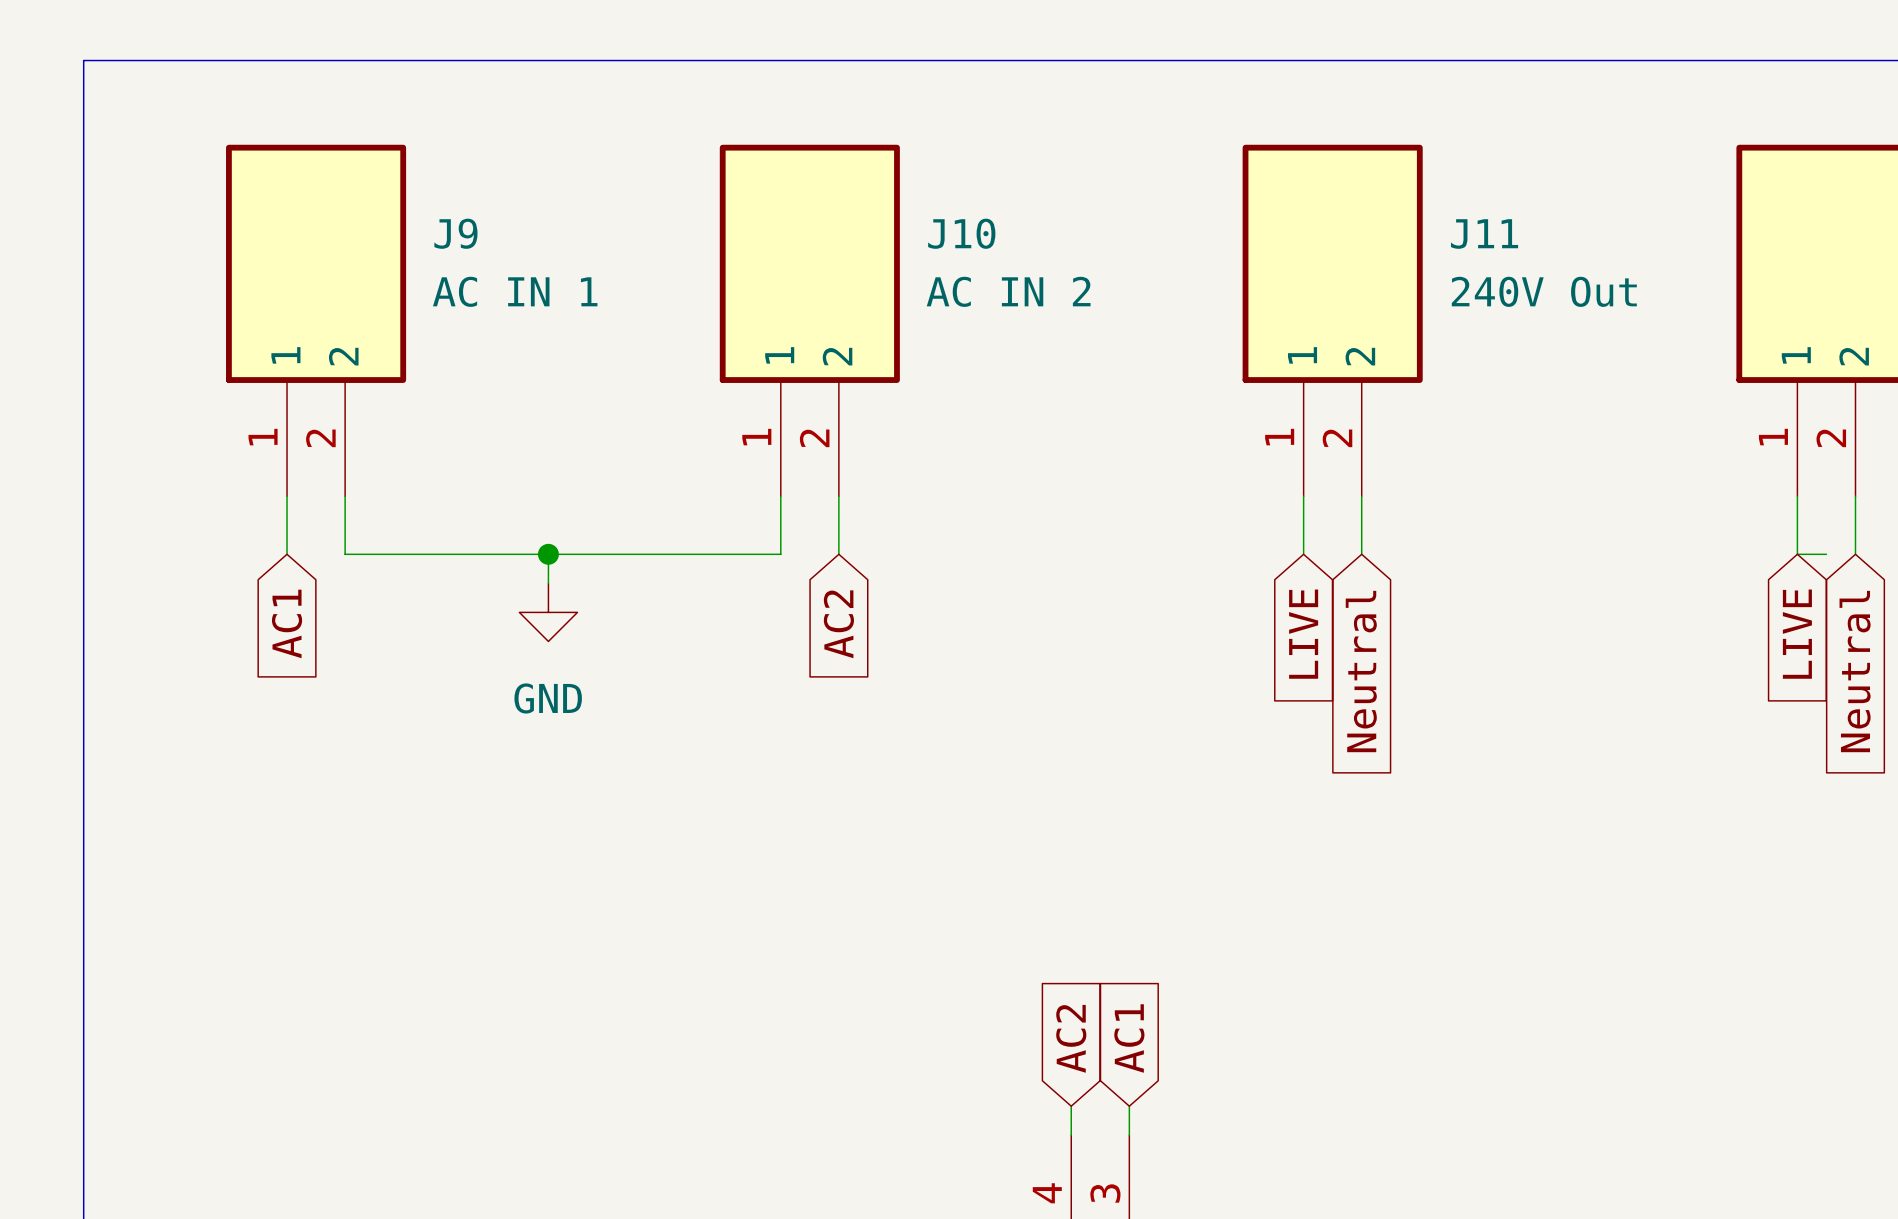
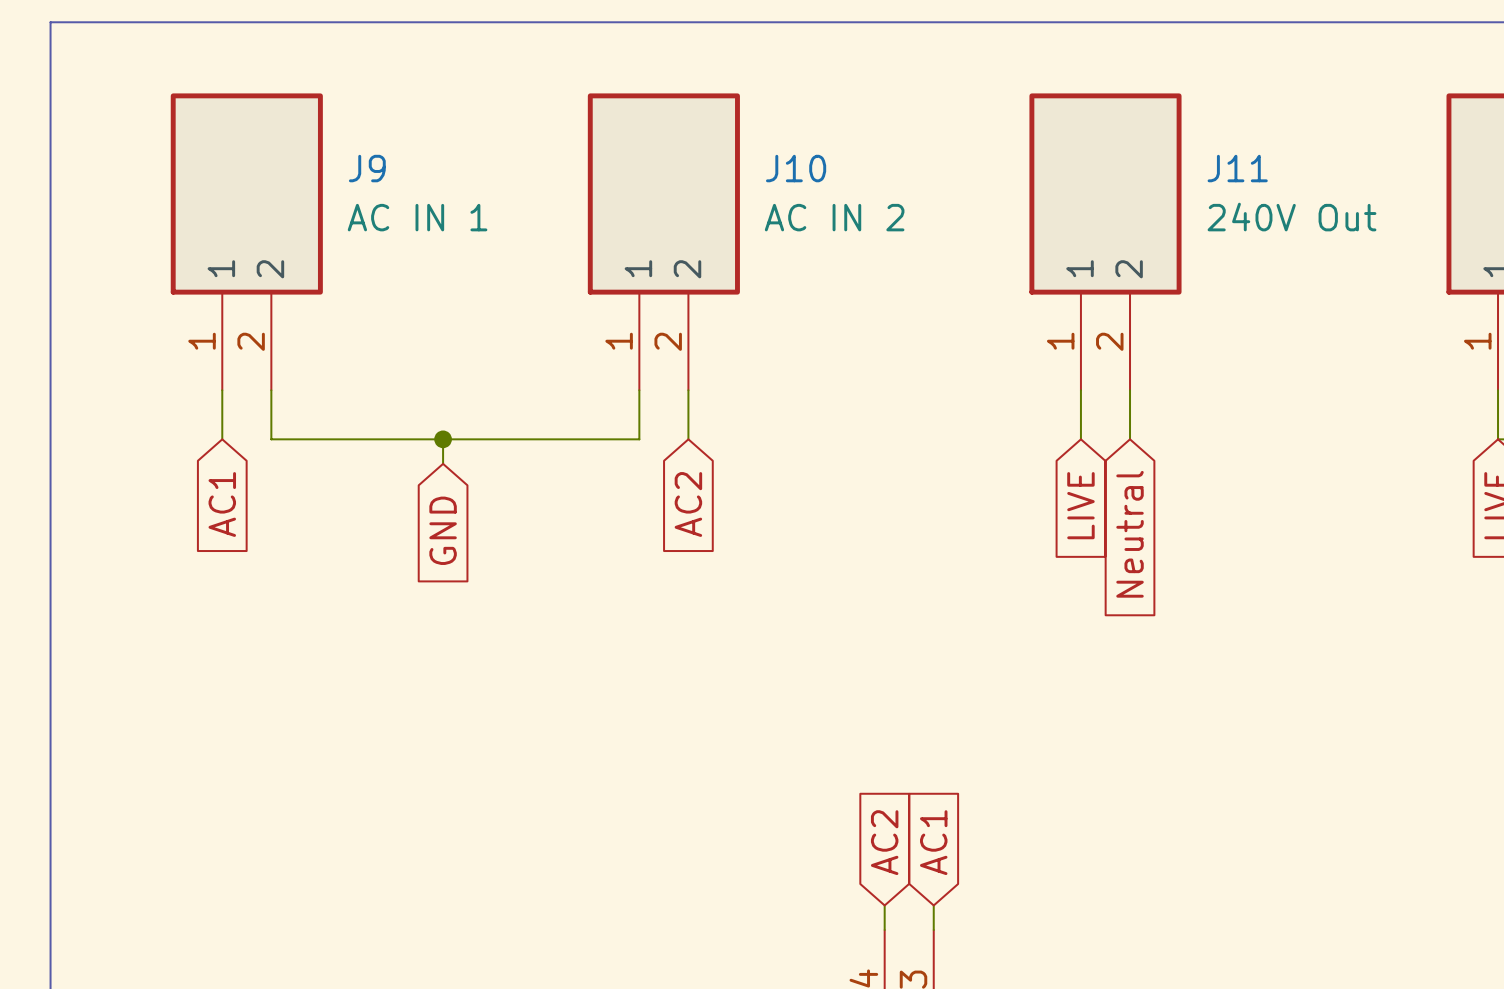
power symbol: GND (548, 612) -> none
global label: none -> GND (443, 530)

